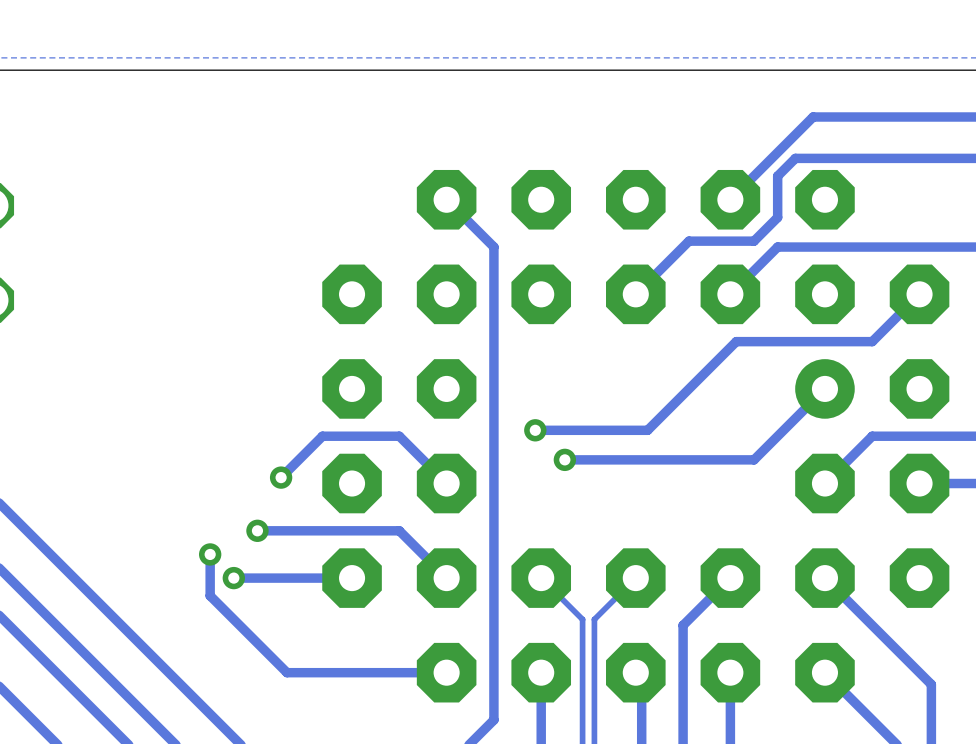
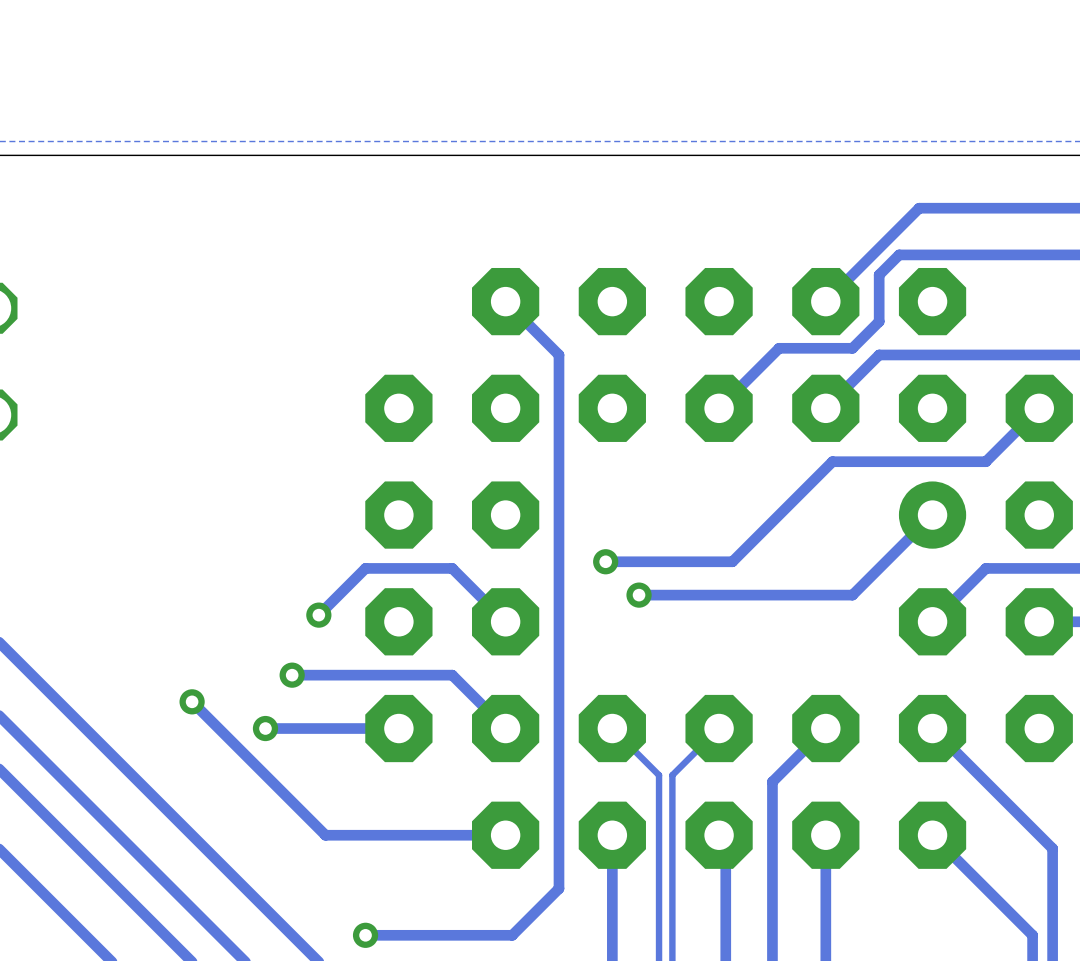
track: (210, 554) (210, 595) -> (192, 701) (238, 748)
via position: (210, 554) -> (192, 701)

